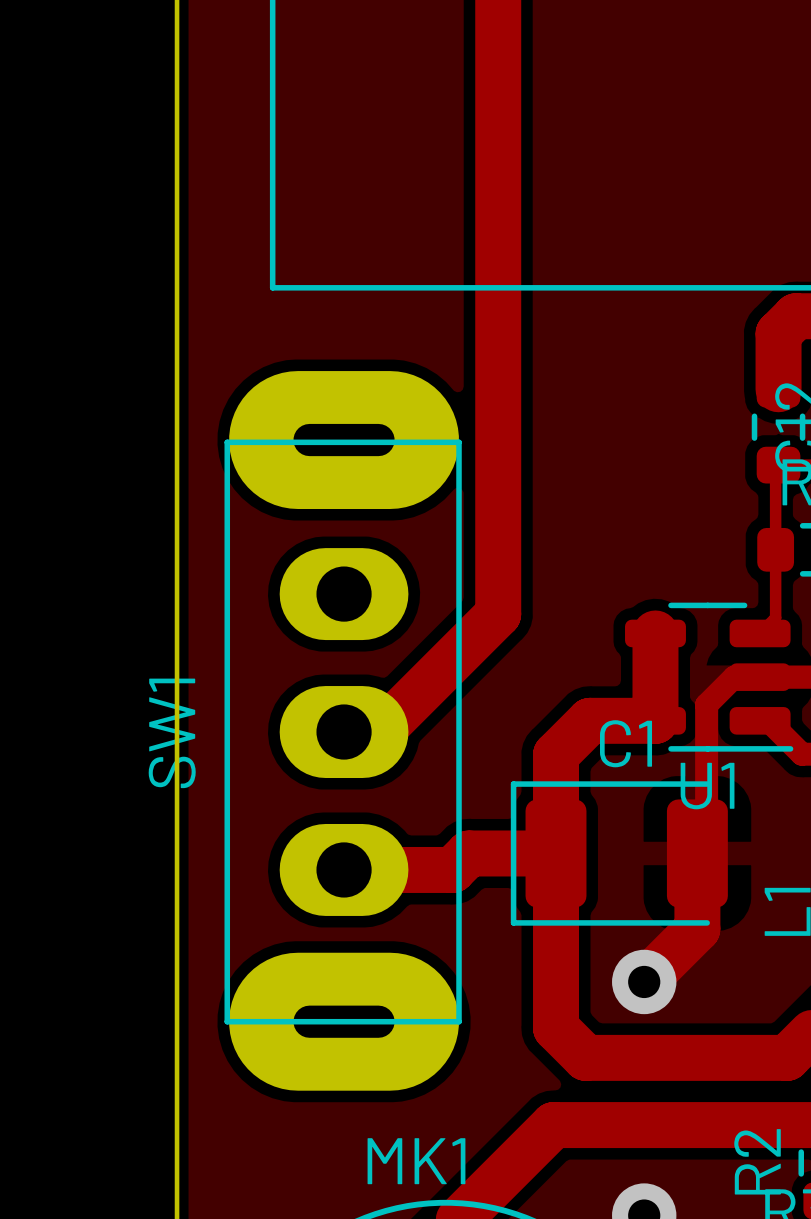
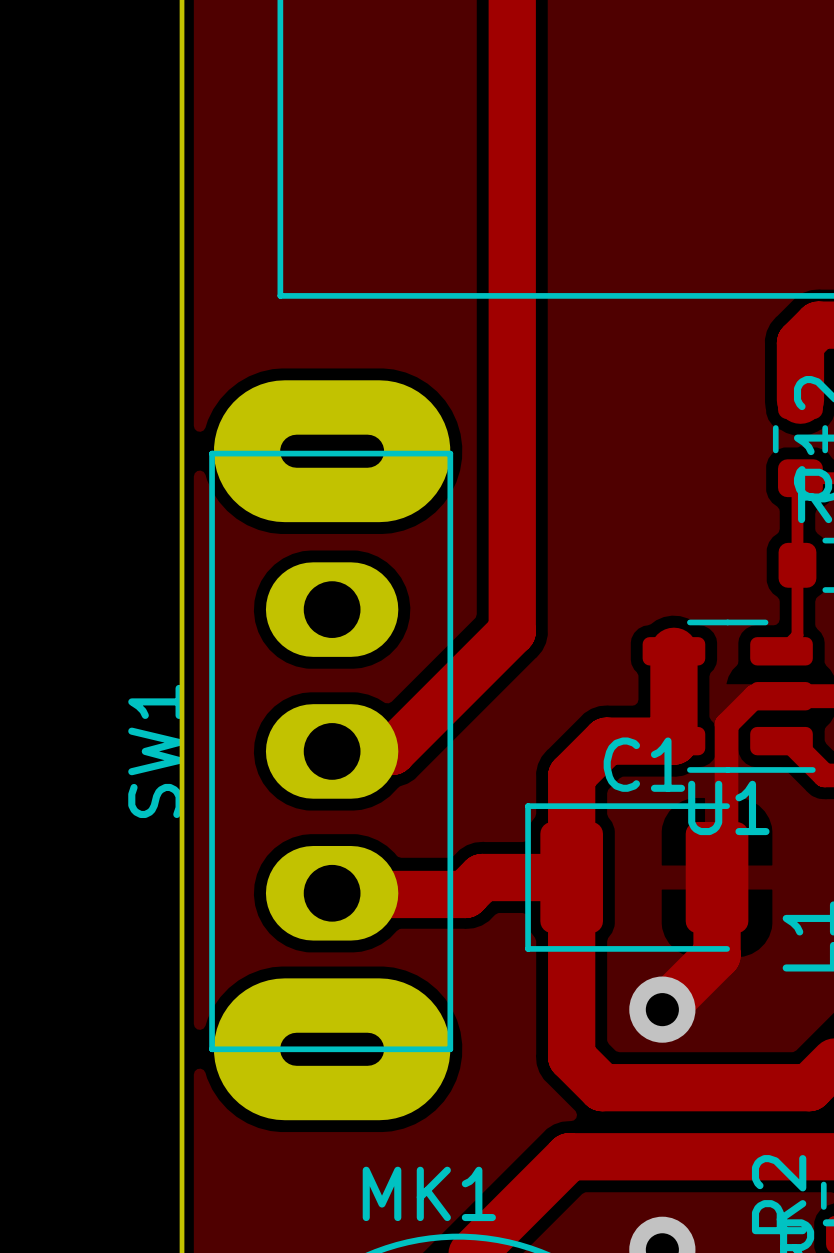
SW1 position: (343, 730) -> (331, 750)

